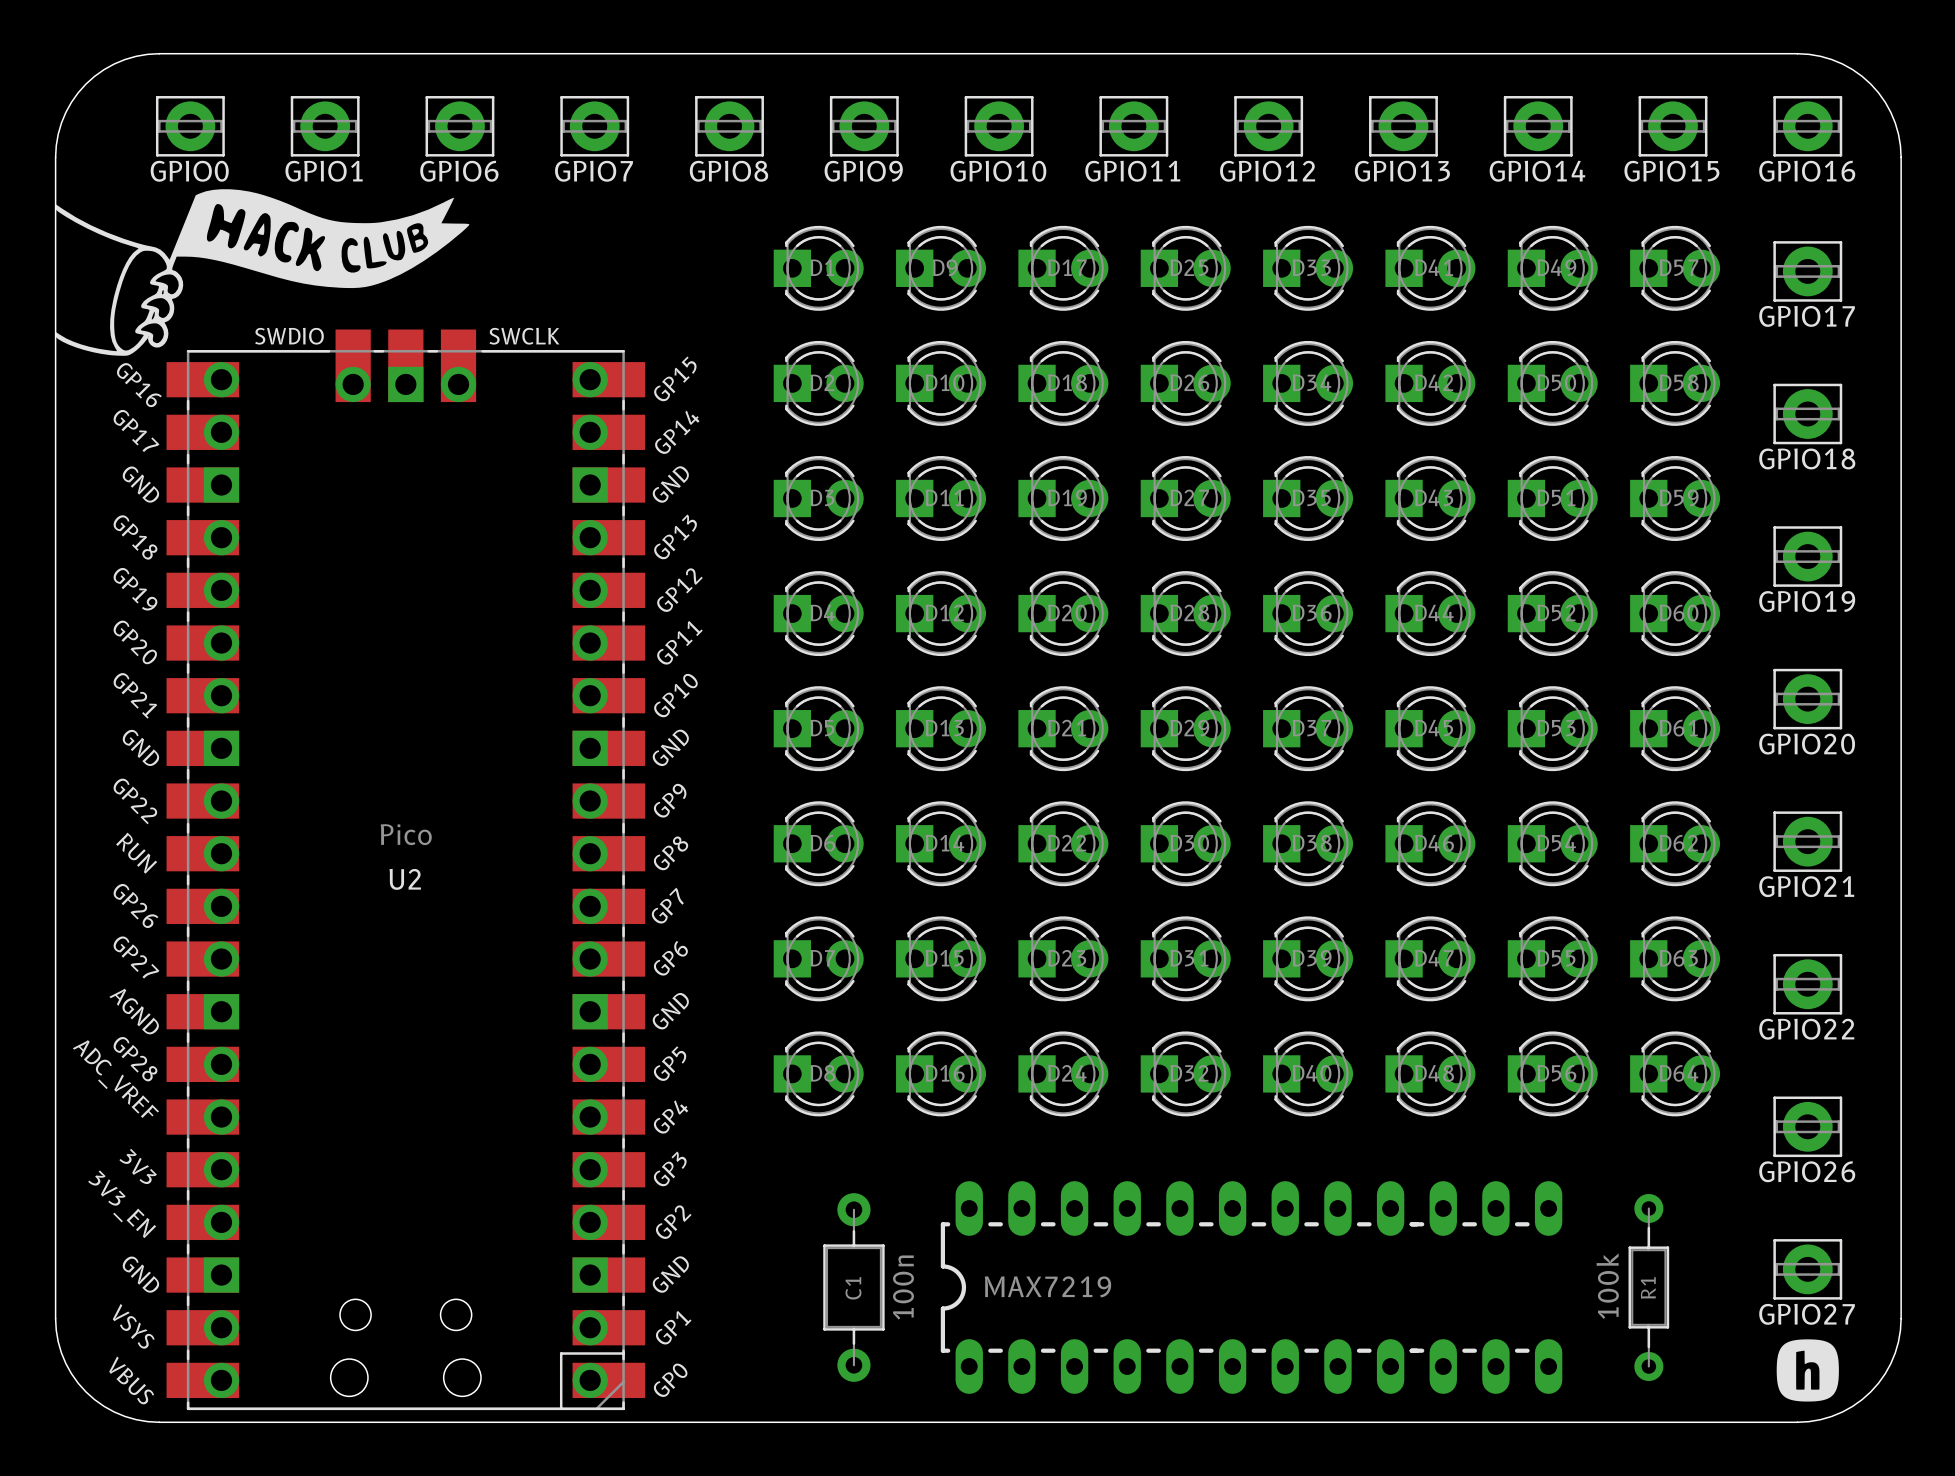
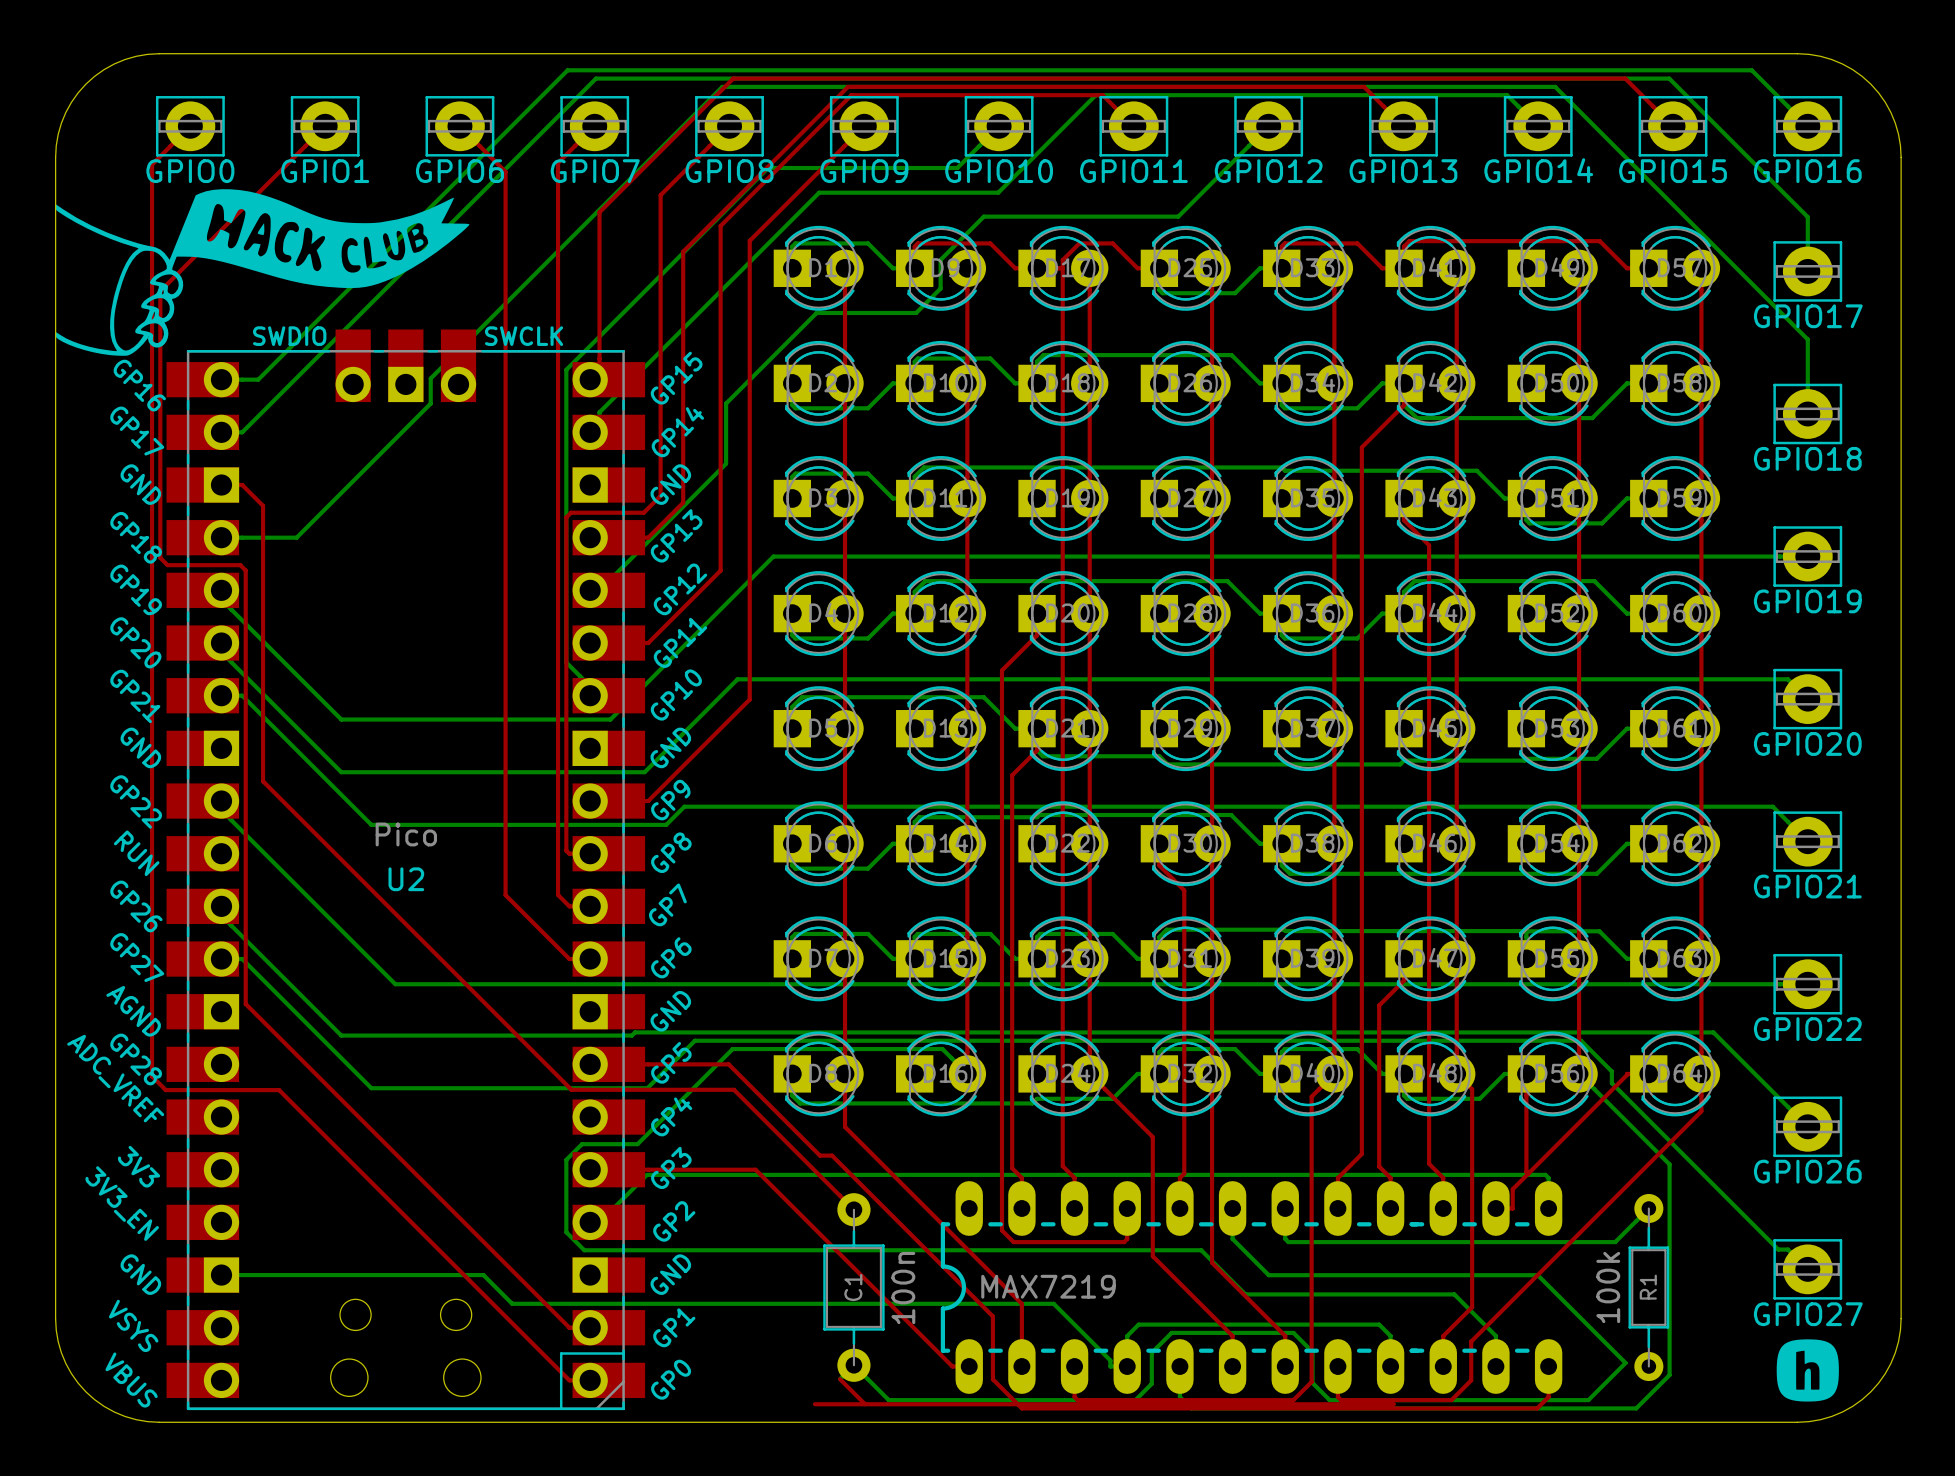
top track: none -> (190, 126) (152, 164) (152, 1076) (165, 1090) (279, 1090) (569, 1380) (599, 1380)
top track: none -> (325, 126) (160, 291) (160, 557) (167, 565) (240, 565) (245, 570) (245, 1004) (569, 1327) (599, 1327)
top track: none -> (459, 126) (505, 171) (505, 895) (569, 959) (599, 959)
top track: none -> (594, 126) (558, 162) (558, 894) (569, 906) (599, 906)
top track: none -> (729, 126) (660, 195) (660, 495) (643, 512) (571, 512) (566, 517) (566, 850) (569, 853) (599, 853)
top track: none -> (864, 126) (749, 240) (749, 699) (648, 801) (599, 801)
bottom track: none -> (999, 126) (957, 168) (768, 168) (566, 369) (566, 662) (599, 695)
top track: none -> (1133, 126) (1102, 95) (851, 95) (720, 225) (720, 570) (648, 643) (599, 643)
bottom track: none -> (1268, 126) (1178, 216) (983, 216) (940, 259) (940, 288) (916, 312) (816, 312) (726, 403) (726, 463) (599, 590)
top track: none -> (1403, 126) (1364, 86) (847, 86) (683, 251) (683, 502) (648, 537) (599, 537)
bottom track: none -> (1538, 126) (1507, 95) (1095, 95) (998, 192) (819, 192) (599, 412) (599, 432)
top track: none -> (1673, 126) (1625, 78) (733, 78) (599, 212) (599, 379)
bottom track: none -> (1807, 126) (1751, 70) (567, 70) (258, 379) (212, 379)
bottom track: none -> (792, 268) (792, 246) (795, 243) (868, 243) (892, 268) (914, 268)
top track: none -> (845, 268) (845, 1127) (1021, 1303) (1021, 1366)
top track: none -> (914, 268) (914, 246) (917, 243) (990, 243) (1015, 268) (1062, 268)
top track: none -> (967, 268) (967, 1073)
top track: none -> (1089, 268) (1089, 1073) (1152, 1137) (1152, 1256) (1232, 1336) (1232, 1366)
top track: none -> (1159, 268) (1137, 268) (1112, 243) (1079, 243) (1062, 260) (1062, 1166) (1074, 1178) (1074, 1208)
bottom track: none -> (1159, 268) (1159, 290) (1162, 293) (1235, 293) (1259, 268) (1281, 268)
top track: none -> (1212, 268) (1212, 1262) (1285, 1336) (1285, 1366)
top track: none -> (1281, 268) (1281, 246) (1284, 243) (1357, 243) (1382, 268) (1404, 268) (1404, 246) (1409, 241) (1599, 241) (1626, 268) (1648, 268)
top track: none -> (1334, 268) (1334, 1073) (1311, 1096) (1311, 1381) (1293, 1400) (1077, 1400) (1074, 1397) (1074, 1366)
top track: none -> (1456, 268) (1456, 1073) (1472, 1089) (1472, 1307) (1443, 1336) (1443, 1366)
top track: none -> (1579, 268) (1579, 1073)
top track: none -> (1701, 268) (1701, 1111) (1471, 1341) (1471, 1380) (1451, 1400) (1341, 1400) (1337, 1397) (1337, 1366)
bottom track: none -> (1807, 271) (1807, 217) (1669, 78) (595, 78) (242, 432) (212, 432)
bottom track: none -> (792, 383) (792, 405) (795, 408) (868, 408) (892, 383) (914, 383) (914, 361) (917, 358) (990, 358) (1015, 383) (1037, 383) (1037, 361) (1043, 355) (1231, 355) (1259, 383) (1281, 383) (1281, 405) (1284, 408) (1357, 408) (1382, 383) (1404, 383) (1404, 405) (1416, 418) (1592, 418) (1626, 383) (1648, 383)
top track: none -> (1404, 383) (1404, 405) (1361, 447) (1361, 1154) (1337, 1178) (1337, 1208)
bottom track: none -> (1807, 413) (1807, 339) (1555, 86) (722, 86) (430, 378) (430, 403) (296, 537) (212, 537)
top track: none -> (212, 485) (242, 485) (263, 505) (263, 781) (571, 1089) (734, 1089) (853, 1209)
bottom track: none -> (792, 498) (792, 476) (795, 473) (868, 473) (892, 498) (914, 498) (914, 476) (923, 467) (1281, 467) (1285, 470) (1476, 470) (1504, 498) (1526, 498) (1526, 520) (1529, 523) (1602, 523) (1626, 498) (1648, 498)
top track: none -> (1404, 498) (1404, 520) (1429, 545) (1429, 1163) (1443, 1178) (1443, 1208)
bottom track: none -> (1807, 556) (773, 556) (610, 719) (341, 719) (212, 590)
bottom track: none -> (792, 613) (792, 635) (795, 638) (868, 638) (892, 613) (914, 613) (914, 591) (925, 581) (1227, 581) (1259, 613) (1281, 613) (1281, 635) (1284, 638) (1357, 638) (1382, 613) (1404, 613) (1404, 591) (1414, 581) (1594, 581) (1626, 613) (1648, 613)
top track: none -> (1037, 613) (1037, 635) (1001, 670) (1001, 1230) (1013, 1242) (1124, 1242) (1127, 1239) (1127, 1208)
bottom track: none -> (212, 643) (341, 772) (644, 772) (737, 679) (1788, 679) (1807, 699)
bottom track: none -> (212, 695) (242, 695) (371, 824) (666, 824) (684, 806) (1772, 806) (1807, 841)
bottom track: none -> (792, 728) (792, 706) (802, 697) (983, 697) (1015, 728) (1037, 728) (1037, 750) (1042, 756) (1159, 756) (1167, 764) (1400, 764) (1404, 760) (1596, 758) (1626, 728) (1648, 728)
top track: none -> (1037, 728) (1037, 750) (1012, 775) (1012, 1168) (1021, 1178) (1021, 1208)
bottom track: none -> (212, 801) (395, 984) (1807, 984)
bottom track: none -> (792, 843) (792, 865) (795, 868) (868, 868) (892, 843) (914, 843) (914, 821) (919, 817) (1231, 815) (1259, 843) (1281, 843) (1281, 865) (1290, 873) (1596, 873) (1626, 843) (1648, 843)
top track: none -> (1159, 843) (1159, 865) (1184, 890) (1184, 1173) (1179, 1178) (1179, 1208)
bottom track: none -> (212, 906) (341, 1035) (631, 1035) (635, 1032) (1713, 1032) (1807, 1126)
bottom track: none -> (1526, 931) (1166, 929) (1159, 937) (1159, 958) (1137, 958) (1112, 933) (1040, 933) (1037, 937) (1037, 958) (1015, 958) (990, 933) (917, 933) (914, 937) (914, 958) (892, 958) (868, 933) (795, 933) (792, 937) (792, 958)
top track: none -> (1404, 958) (1404, 980) (1379, 1005) (1379, 1166) (1390, 1178) (1390, 1208)
bottom track: none -> (1526, 958) (1526, 931) (1599, 931) (1626, 958) (1648, 958)
bottom track: none -> (212, 959) (242, 959) (371, 1088) (647, 1088) (694, 1040) (1581, 1040) (1611, 1071) (1611, 1083) (1778, 1249) (1788, 1249) (1807, 1269)
top track: none -> (599, 1064) (728, 1064) (819, 1155) (832, 1155) (992, 1316) (992, 1379) (1021, 1408) (1537, 1408) (1548, 1397) (1548, 1366)
bottom track: none -> (792, 1073) (792, 1095) (800, 1103) (1032, 1103) (1037, 1098) (1112, 1098) (1137, 1073) (1159, 1073) (1159, 1052) (1162, 1049) (1235, 1049) (1259, 1073) (1281, 1073) (1281, 1052) (1284, 1049) (1357, 1049) (1382, 1073) (1404, 1073) (1404, 1095) (1407, 1098) (1479, 1098) (1504, 1073) (1526, 1073)
bottom track: none -> (967, 1073) (942, 1049) (732, 1049) (637, 1144) (582, 1144) (566, 1159) (566, 1232) (584, 1250) (1201, 1250) (1245, 1294) (1454, 1294) (1495, 1336) (1495, 1366)
top track: none -> (1526, 1073) (1526, 1171) (1528, 1173)
bottom track: none -> (1579, 1073) (1669, 1164) (1669, 1375) (1636, 1408) (1191, 1408) (1179, 1397) (1179, 1366)
top track: none -> (1648, 1073) (1626, 1073) (1512, 1189) (1512, 1208) (1495, 1208)
top track: none -> (599, 1169) (755, 1169) (952, 1366) (969, 1366)
bottom track: none -> (1232, 1208) (1232, 1239) (1268, 1275) (1537, 1275) (1625, 1363) (1588, 1400) (1329, 1400) (1312, 1382) (1312, 1351) (1293, 1332) (1171, 1332) (1151, 1352) (1151, 1383) (1135, 1400) (888, 1400) (853, 1365) (840, 1379)
bottom track: none -> (1285, 1208) (1285, 1239) (1288, 1242) (1615, 1242) (1648, 1208)
bottom track: none -> (1548, 1208) (1548, 1178) (1545, 1174) (647, 1174) (599, 1222)
bottom track: none -> (212, 1275) (483, 1275) (512, 1303) (1053, 1303) (1110, 1360) (1110, 1366) (1127, 1366) (1127, 1336) (1138, 1324) (1379, 1324) (1390, 1336) (1390, 1366)
top track: none -> (840, 1379) (865, 1404)
top track: none -> (814, 1404) (1393, 1404)

